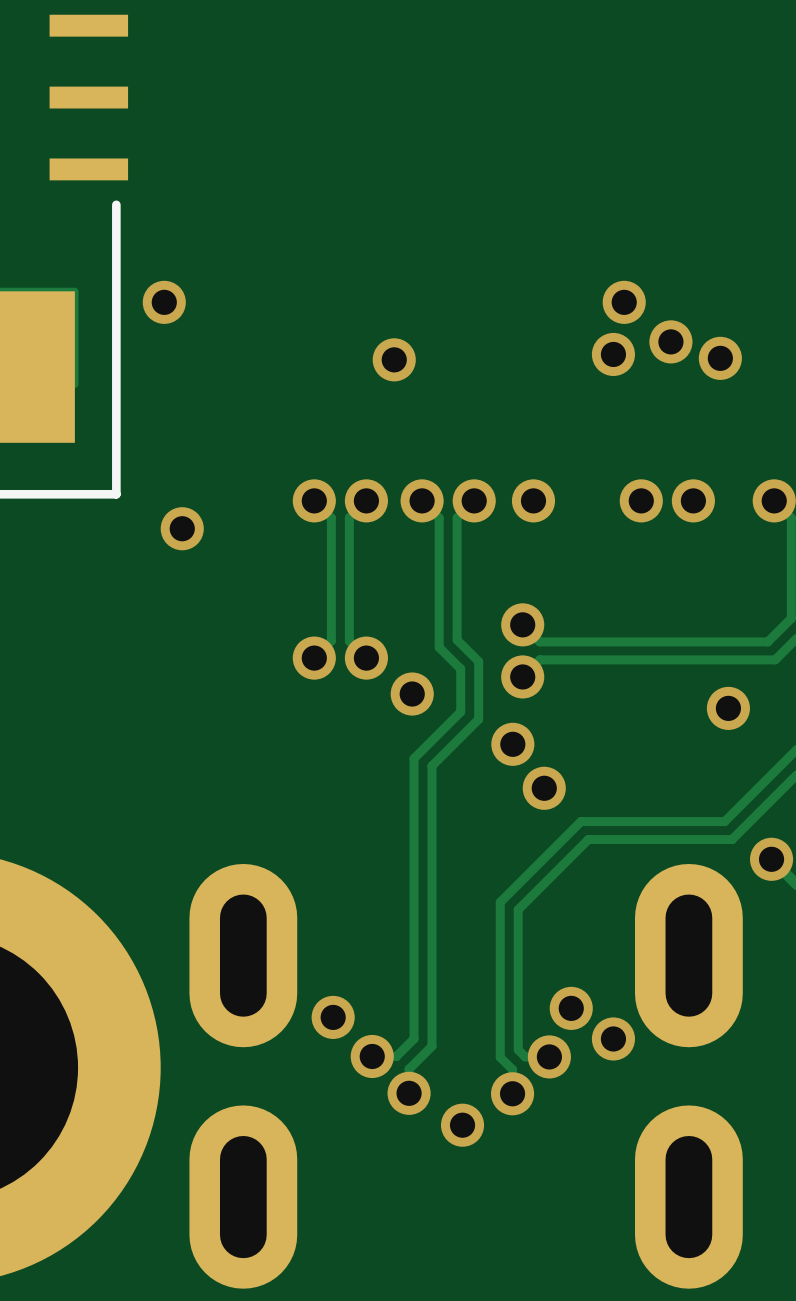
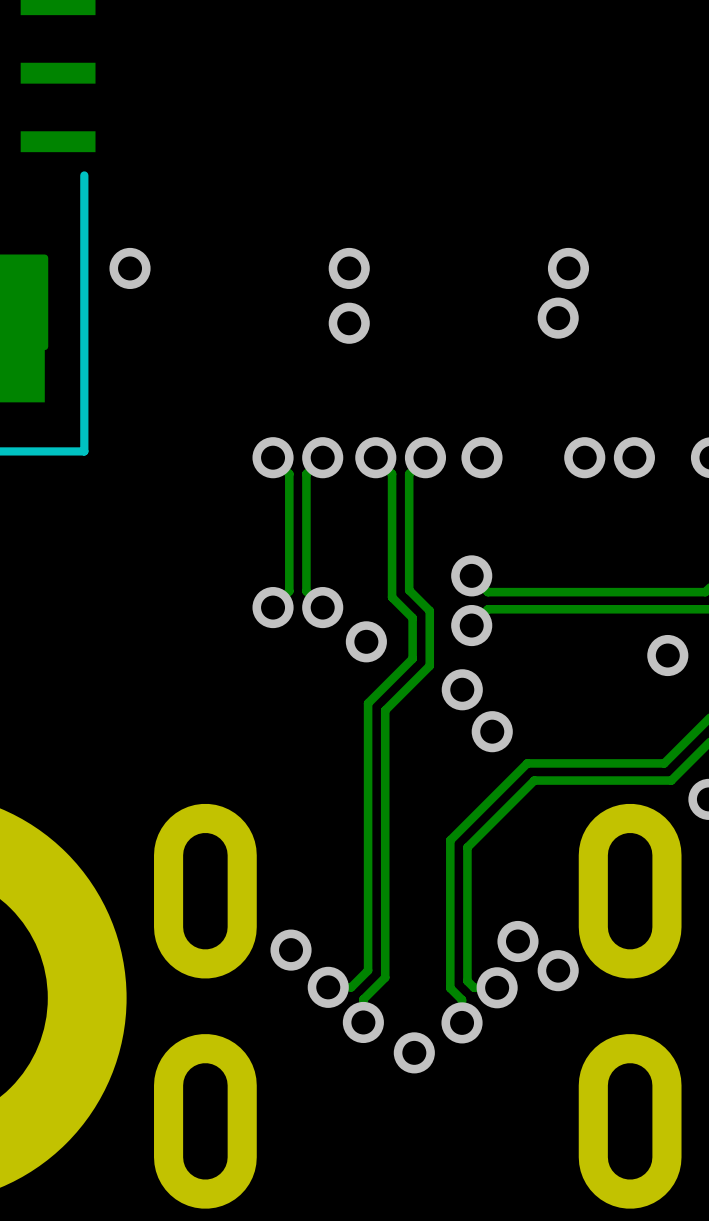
via: none -> (349, 268)
via: (670, 341) -> none
via: (720, 358) -> none
via: (182, 528) -> none

